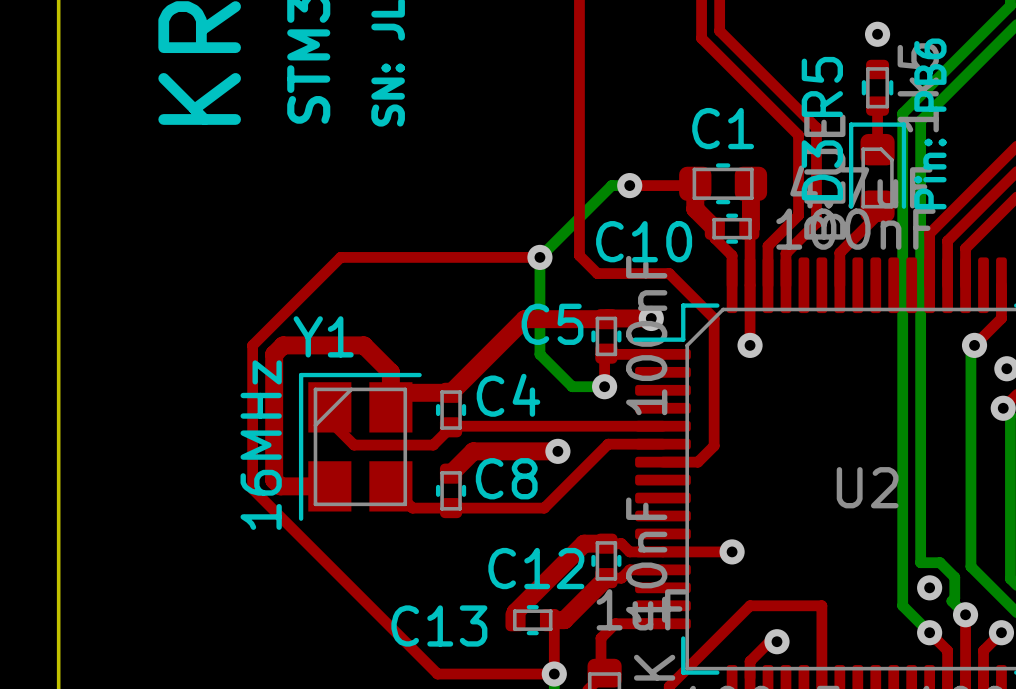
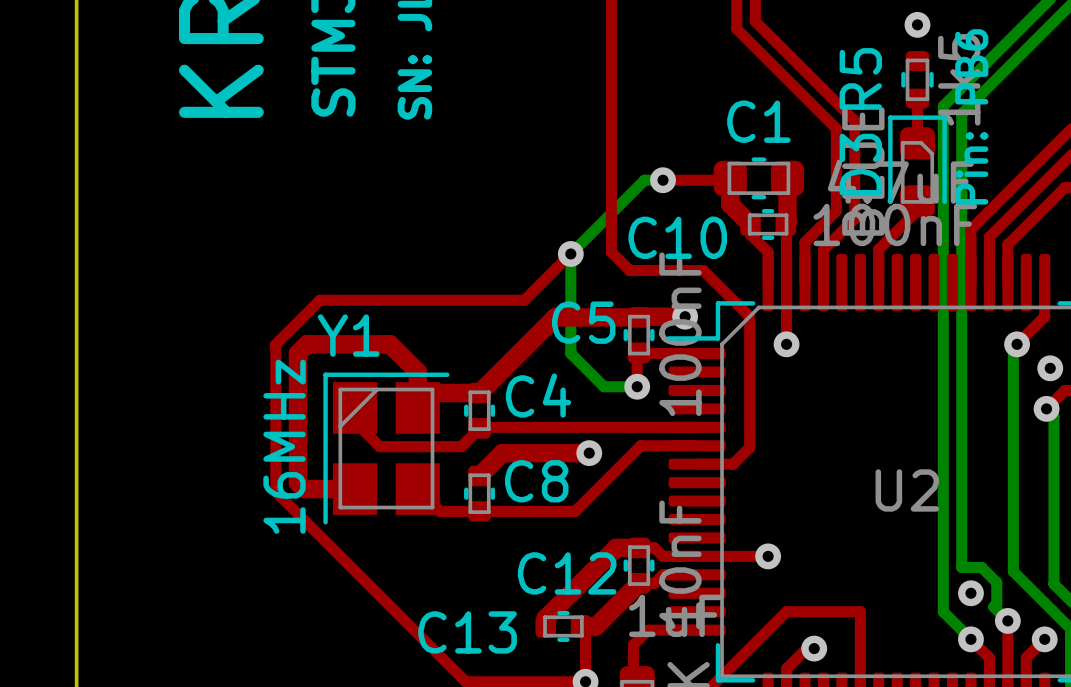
top track: (539, 257) (340, 257) (295, 302) -> (570, 253) (524, 300) (319, 300)

